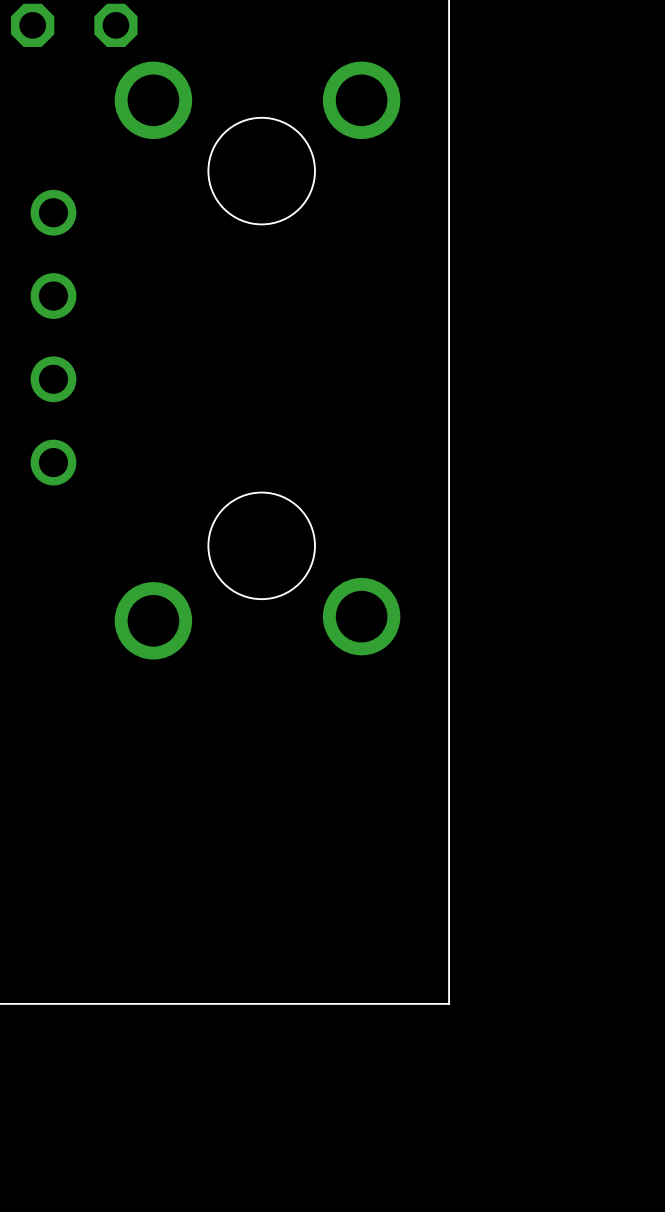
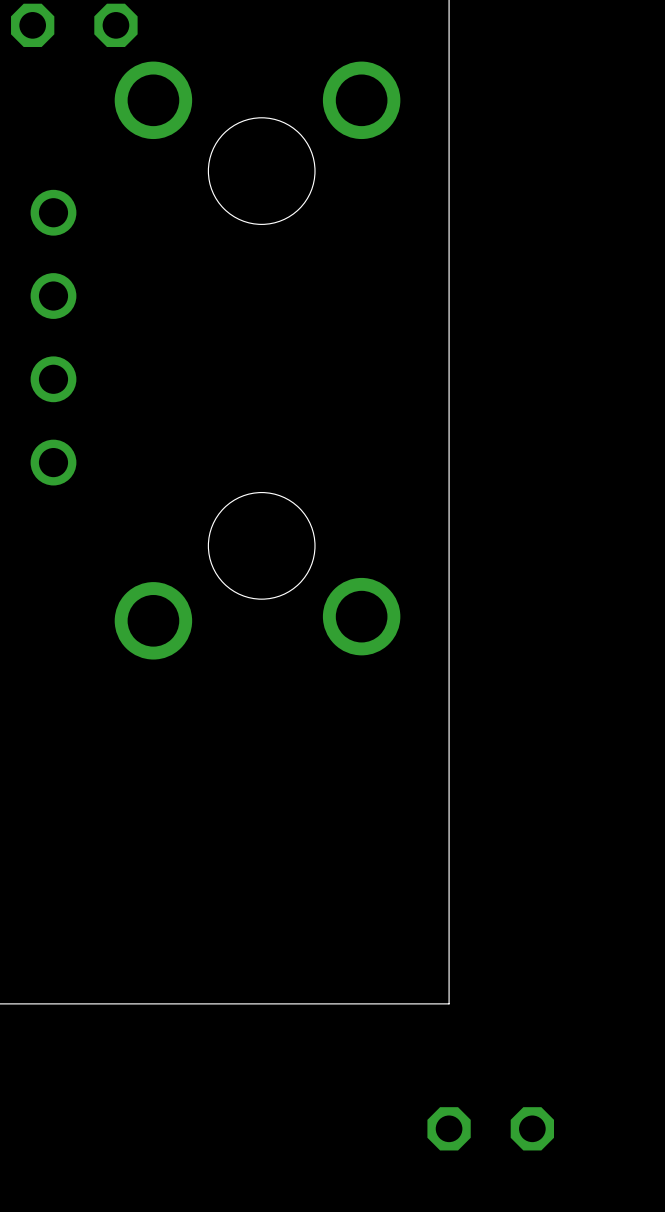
part: none -> (490, 1128)

